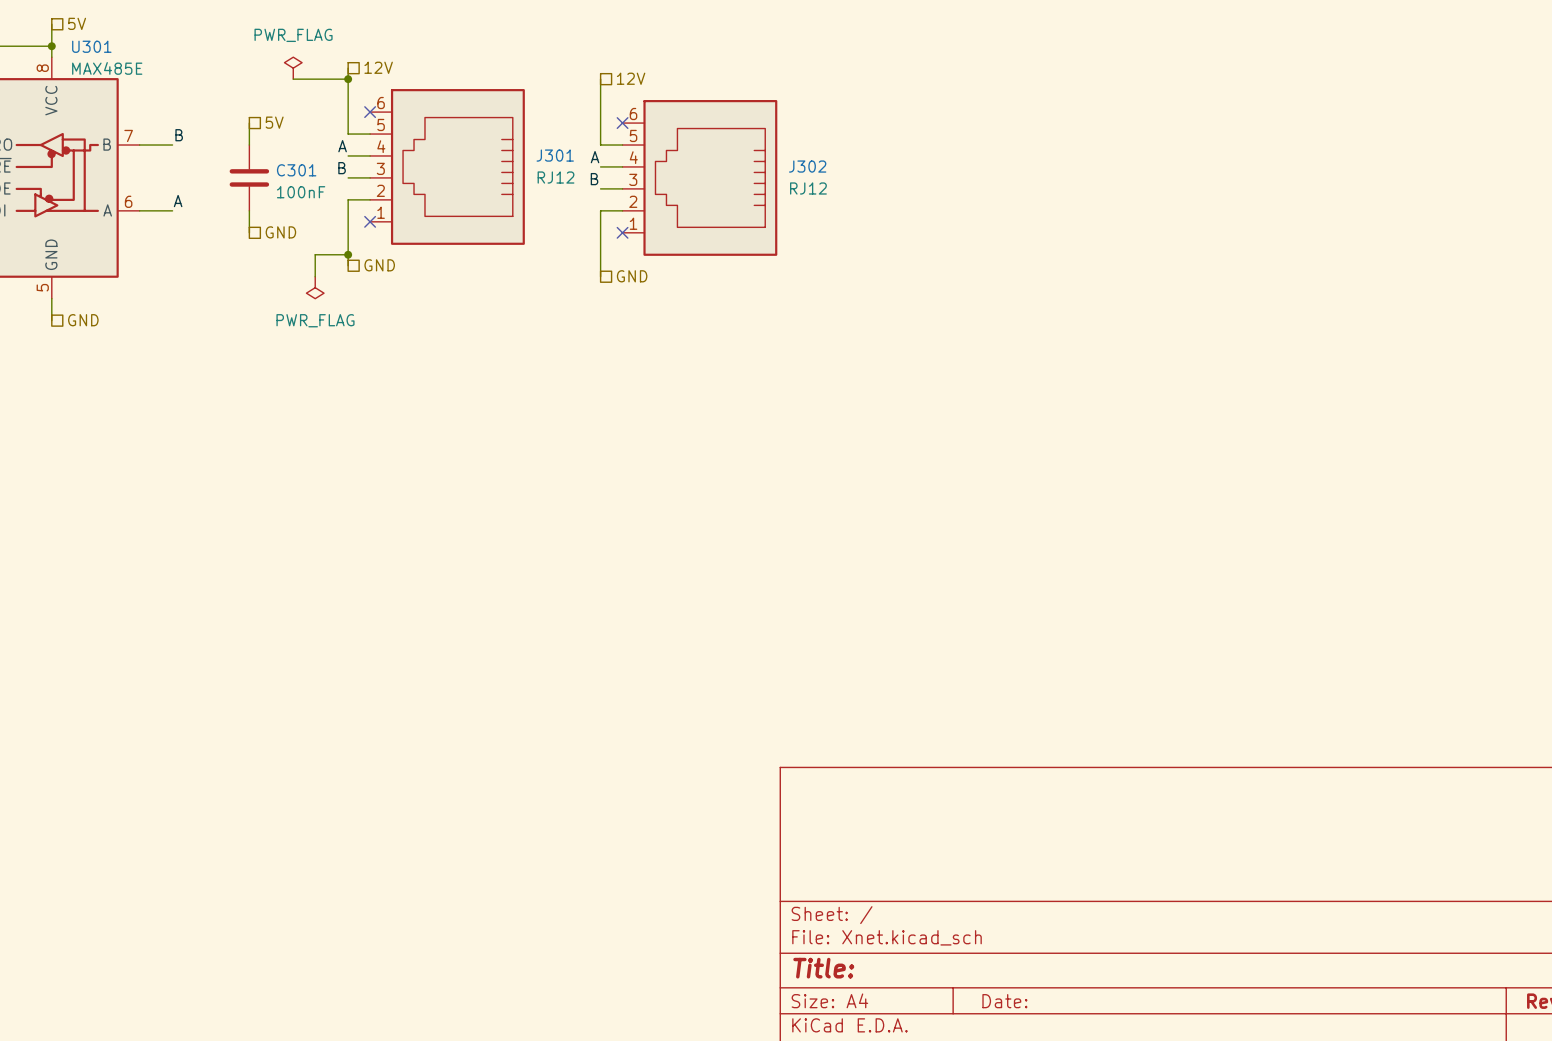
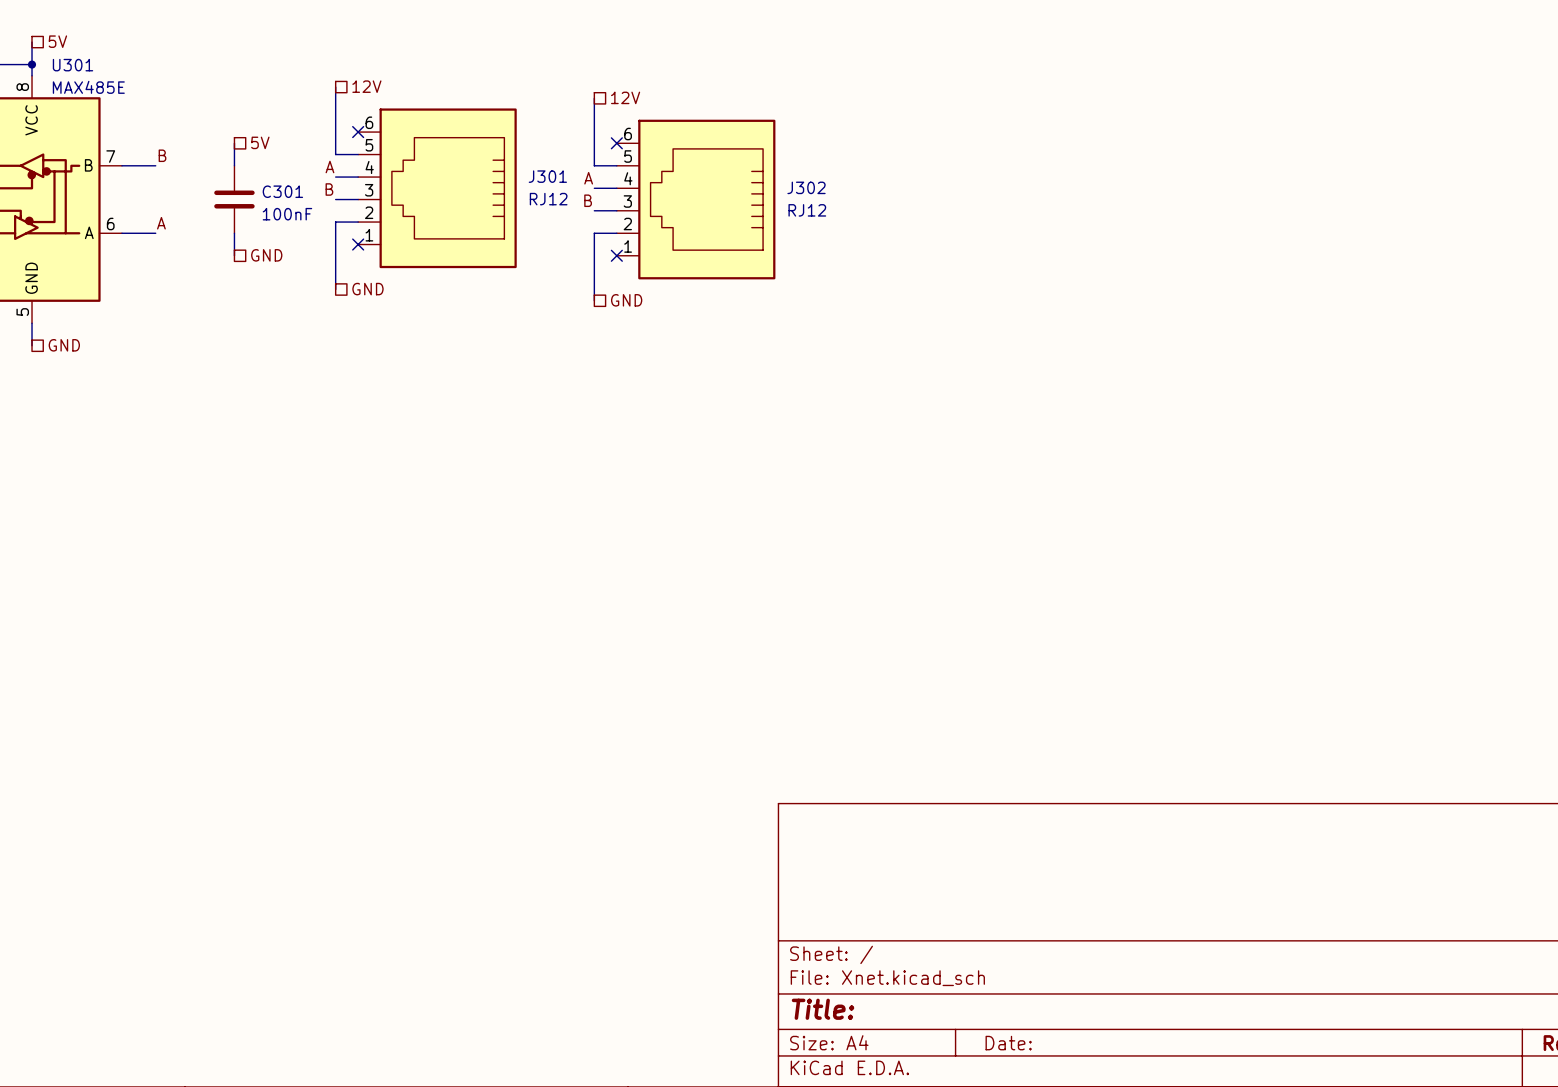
power symbol: PWR_FLAG (293, 68) -> none
wire: (293, 79) (348, 79) -> none
junction: (348, 79) -> none
wire: (348, 254) (315, 254) (315, 276) -> none
junction: (348, 254) -> none
power symbol: PWR_FLAG (315, 287) -> none

